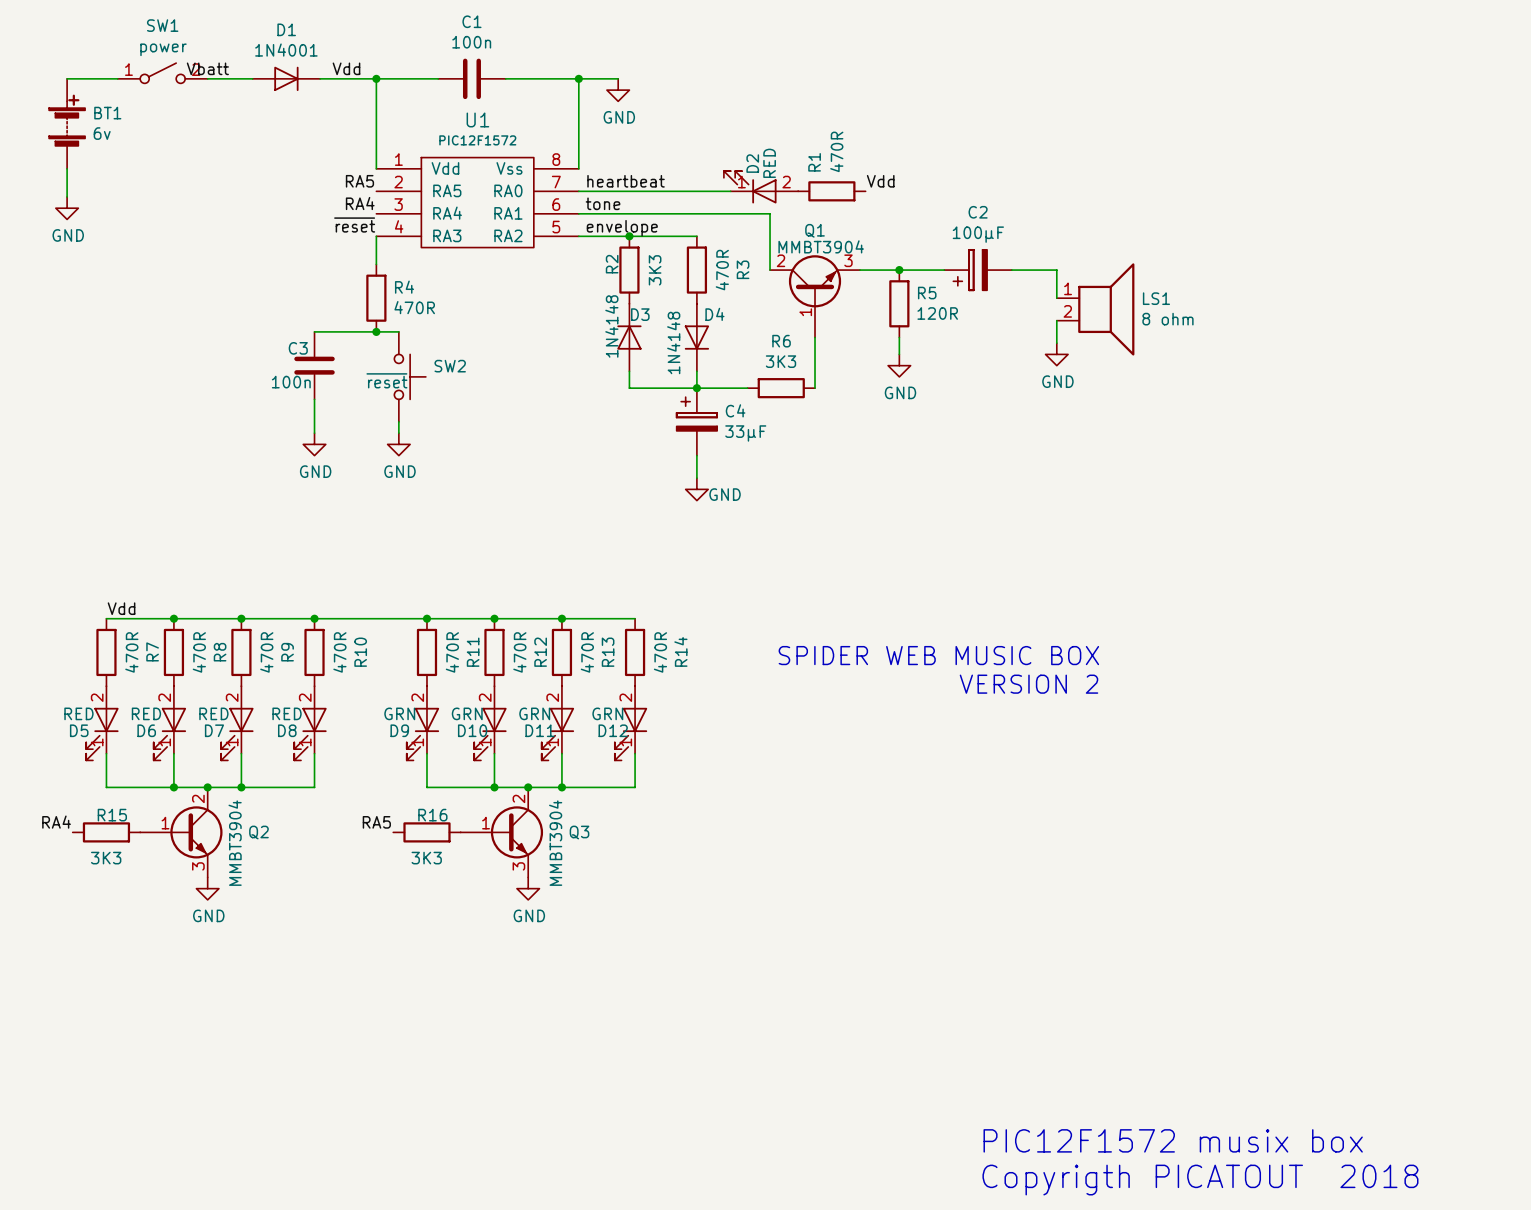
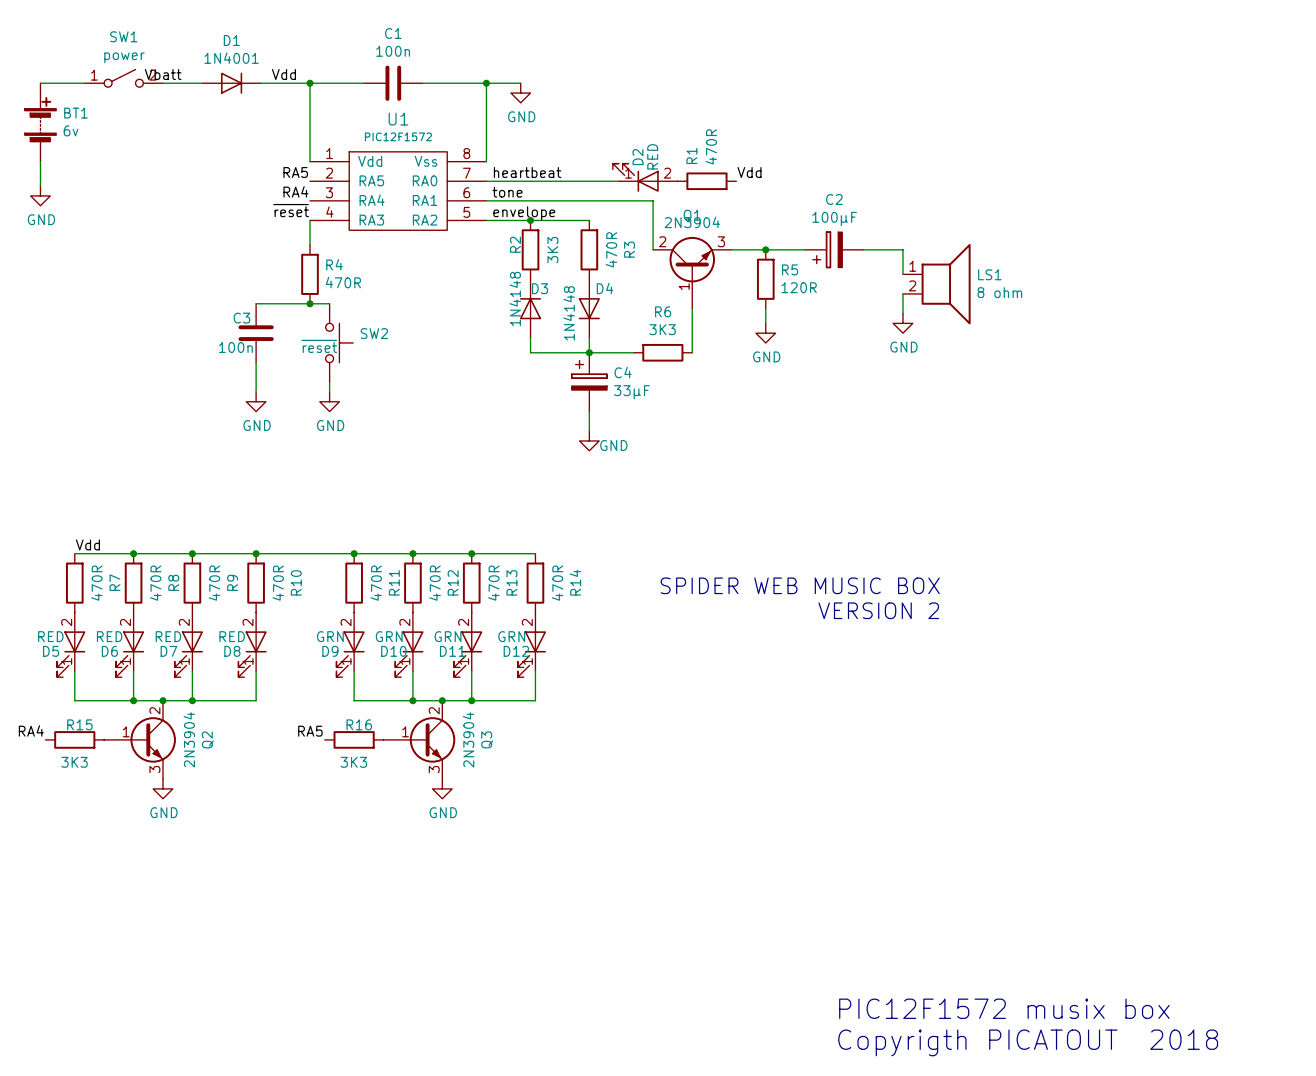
Q1 value: MMBT3904 (821, 246) -> 2N3904 (692, 222)
Q2 name rotation: 0° (258, 832) -> 90° counterclockwise (207, 739)
Q3 name rotation: 0° (579, 832) -> 90° counterclockwise (487, 739)
Q2 value: MMBT3904 (235, 843) -> 2N3904 (189, 739)
Q3 value: MMBT3904 (555, 843) -> 2N3904 (468, 739)

